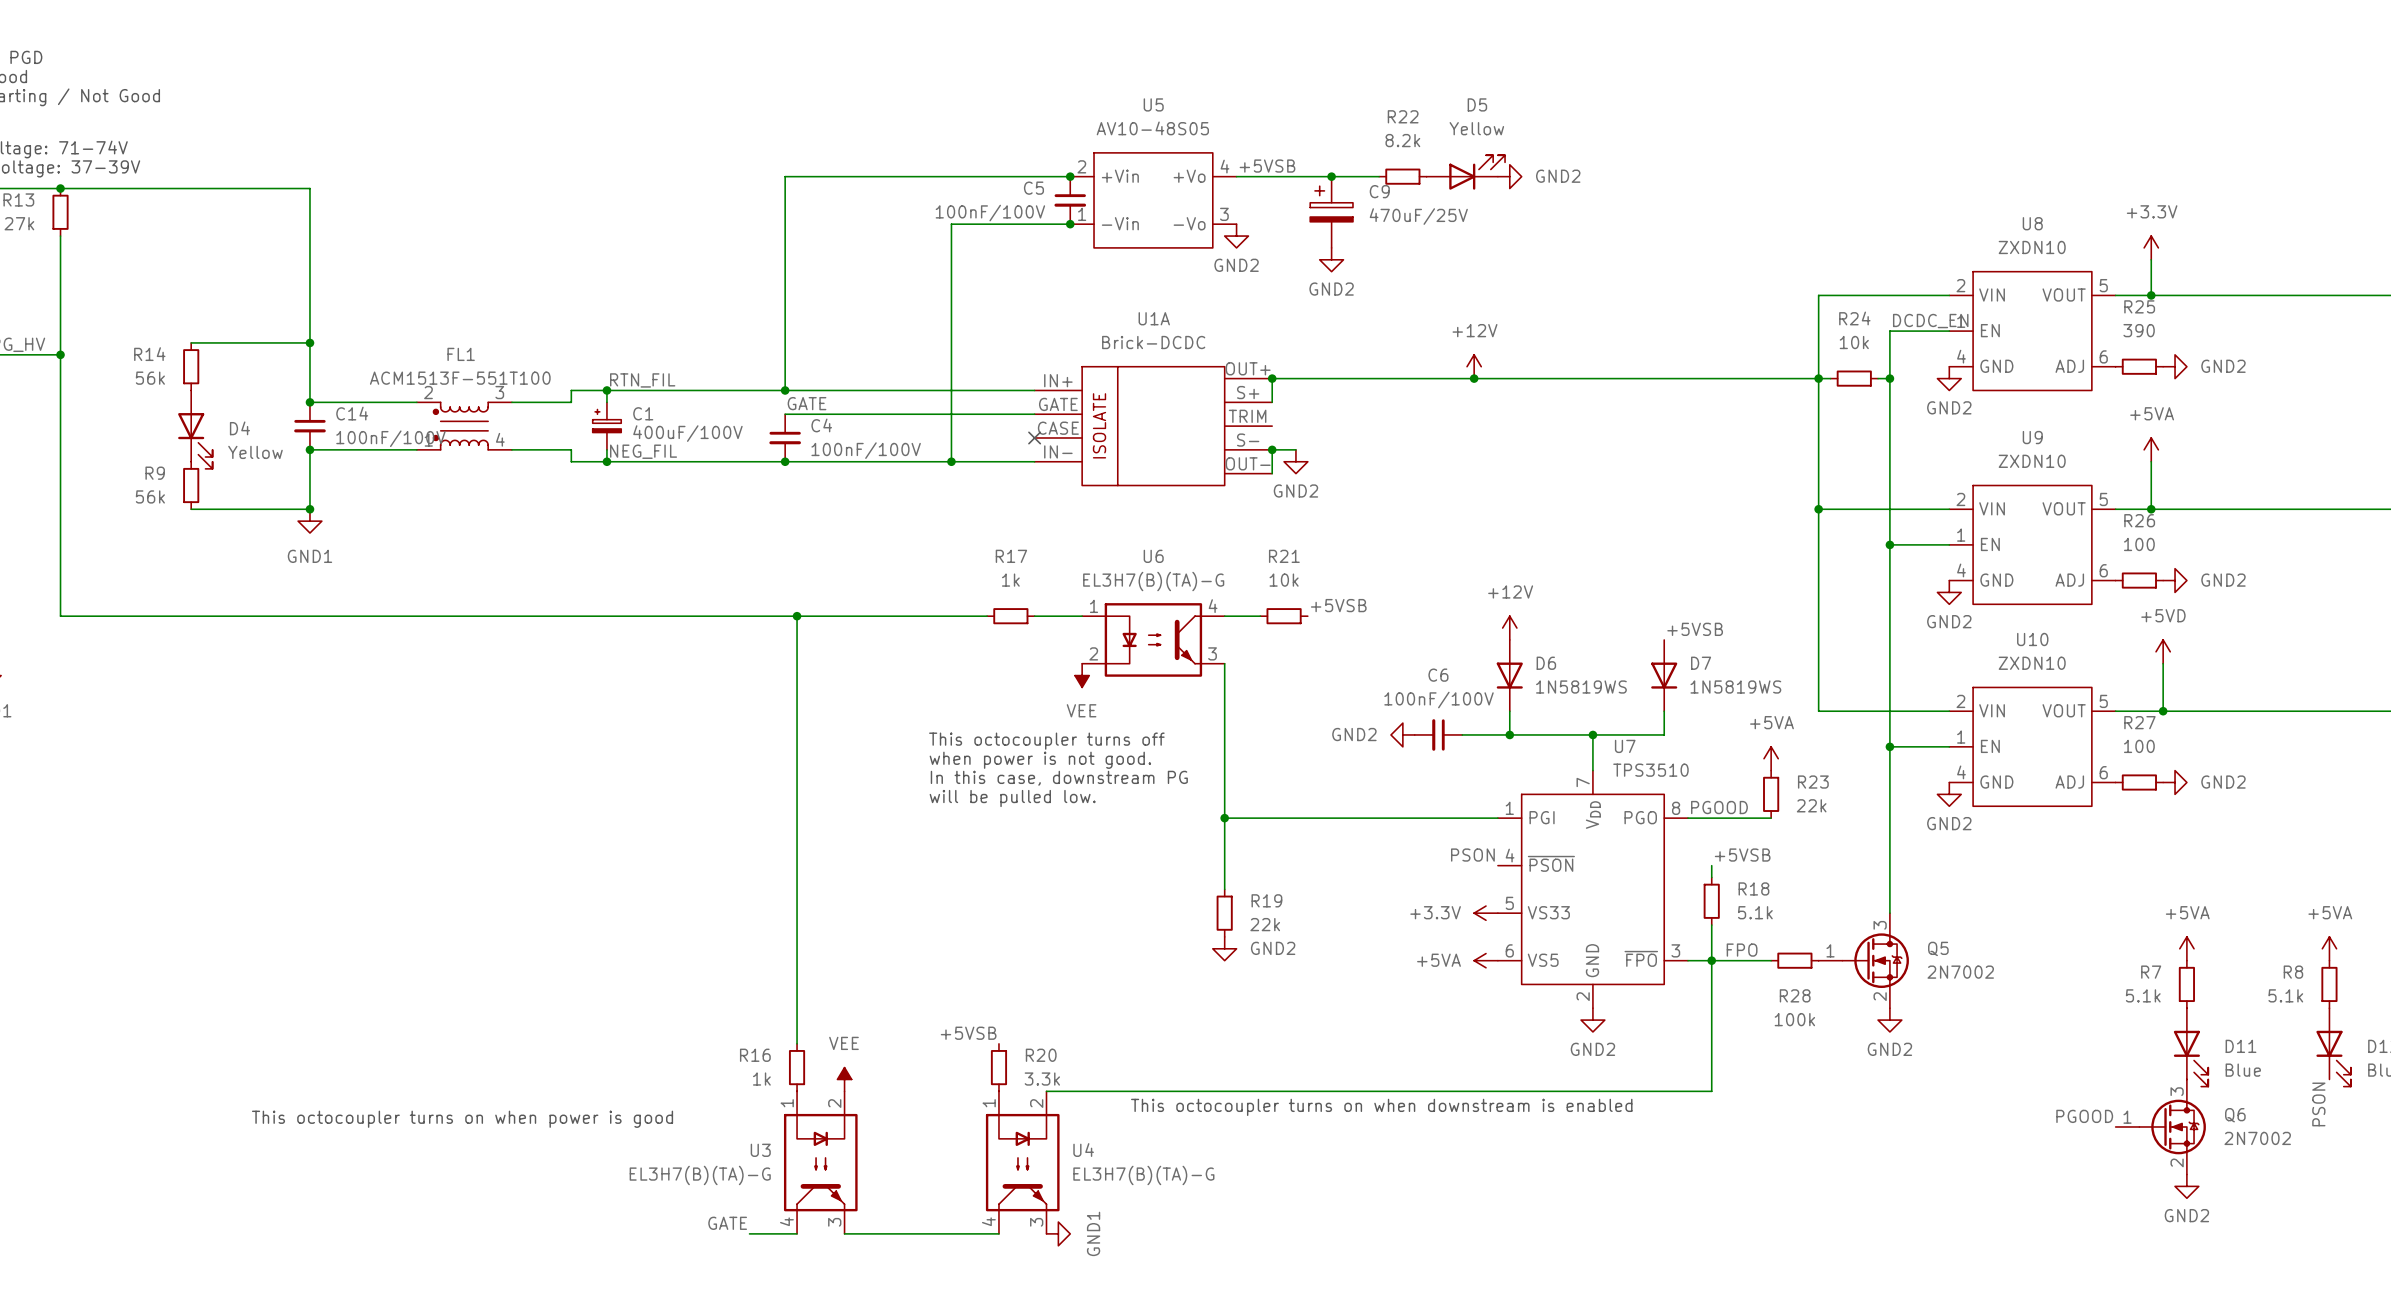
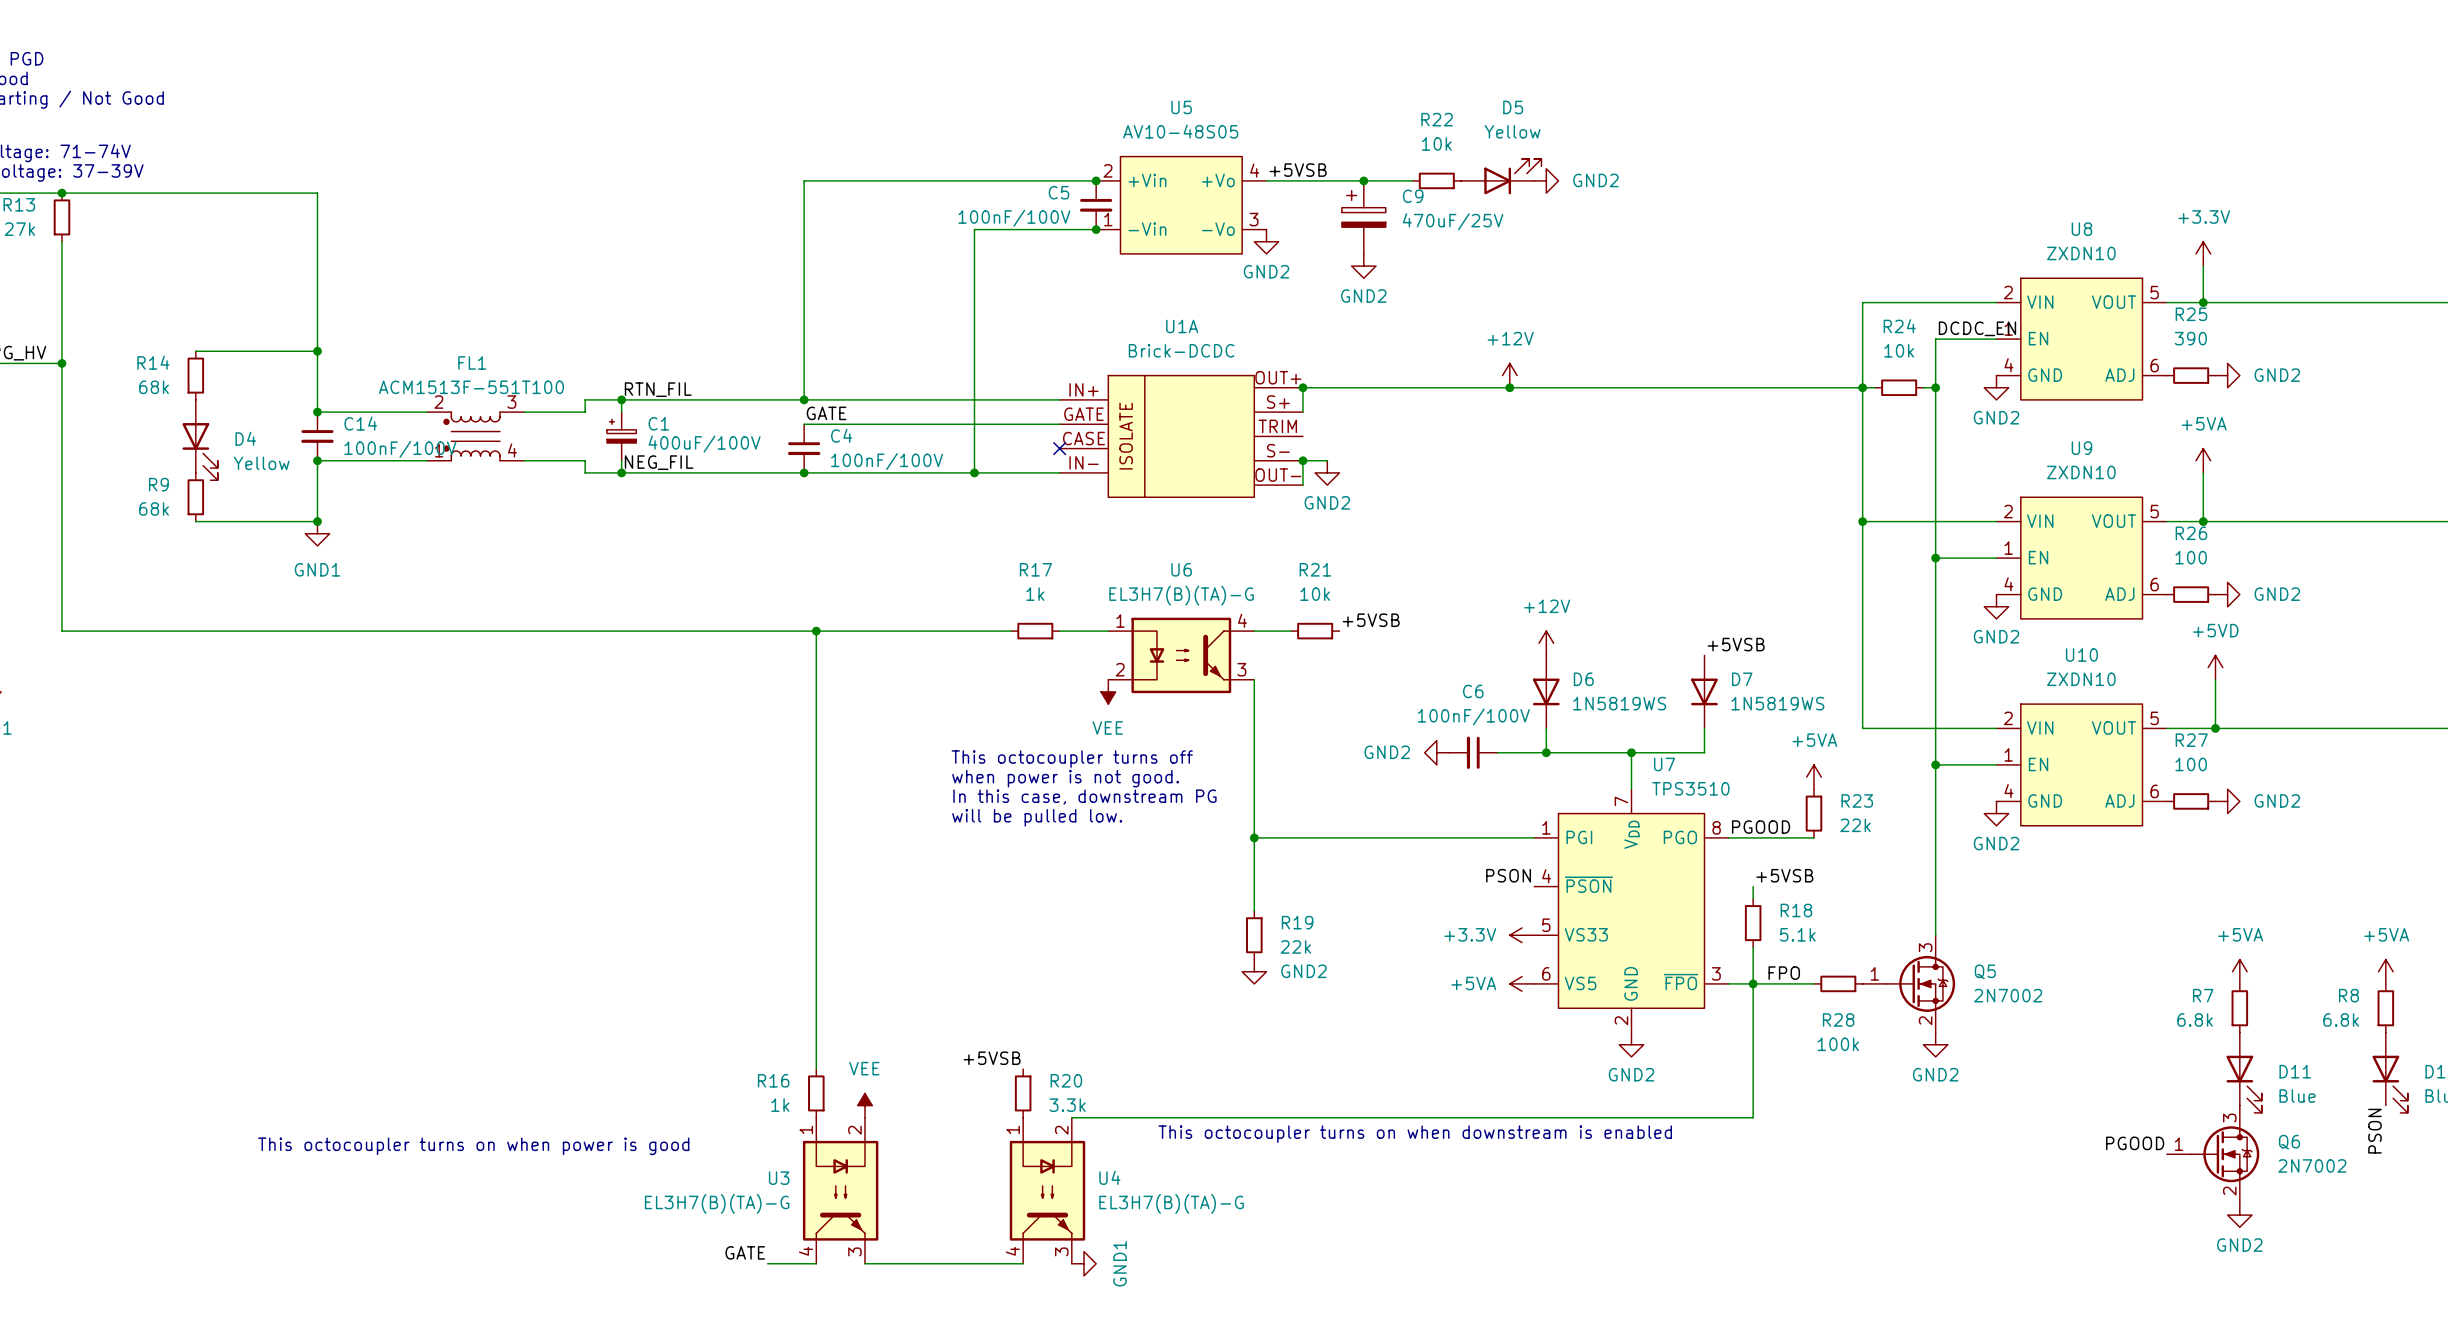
R22 value: 8.2k (1402, 140) -> 10k (1436, 143)
R14 value: 56k (150, 378) -> 68k (154, 387)
R9 value: 56k (150, 496) -> 68k (154, 508)
R7 value: 5.1k (2143, 995) -> 6.8k (2195, 1019)
R8 value: 5.1k (2285, 995) -> 6.8k (2341, 1019)

